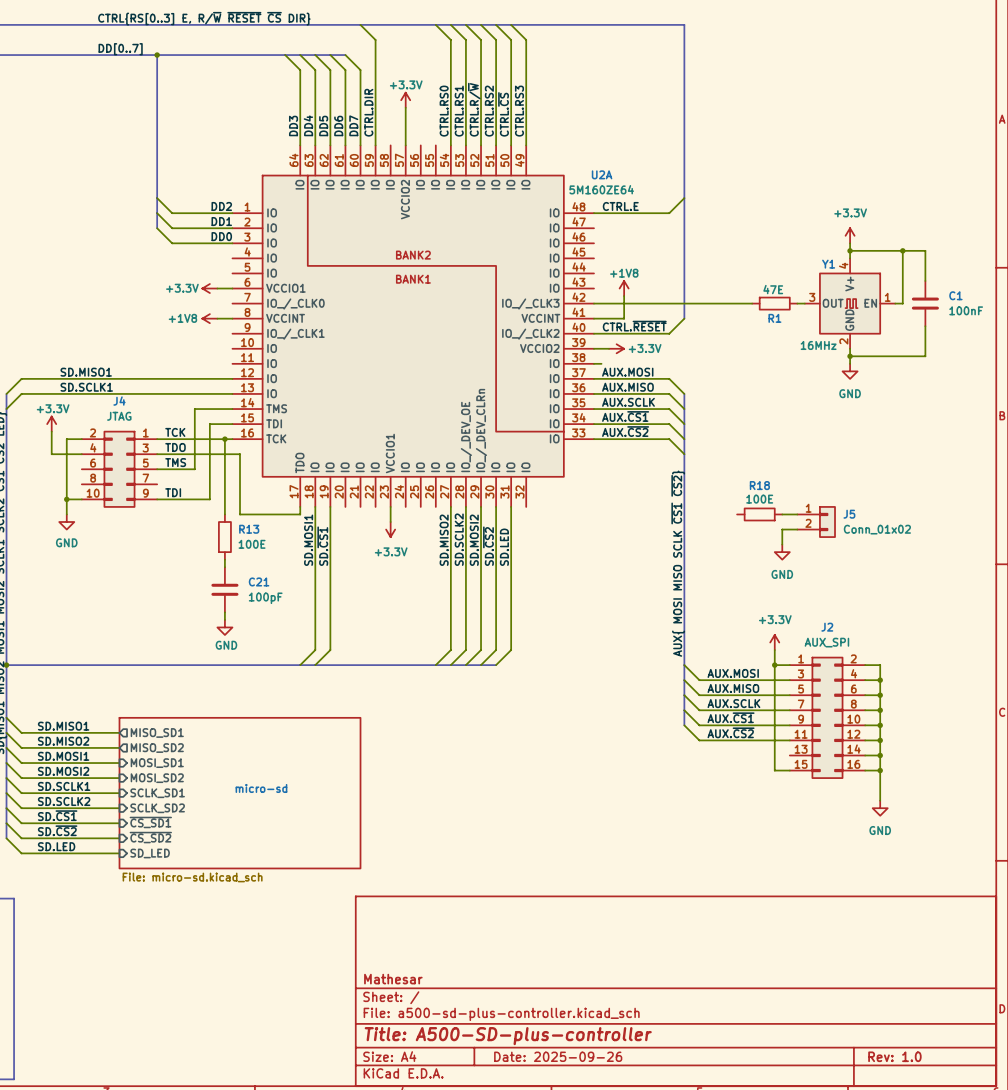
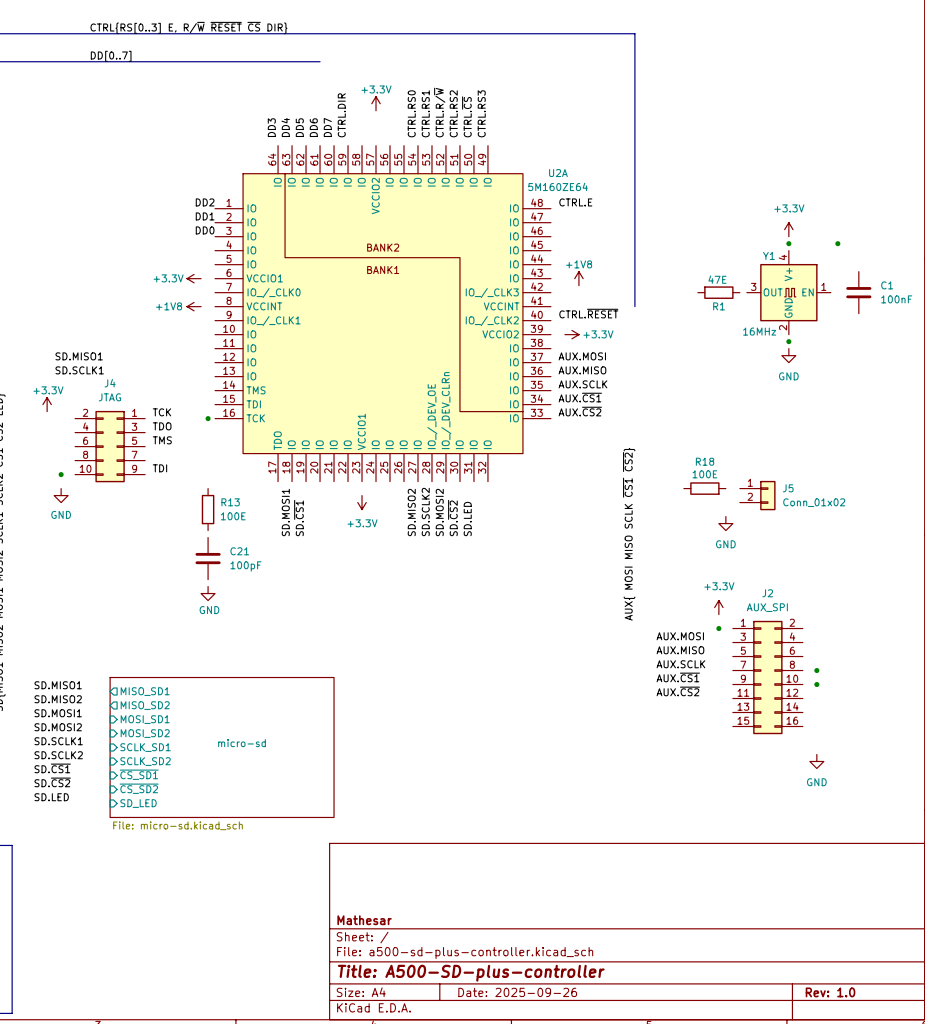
wire: (360, 24) (375, 39) (375, 145) -> none
wire: (435, 24) (450, 39) (450, 145) -> none
wire: (450, 24) (465, 39) (465, 145) -> none
wire: (465, 24) (481, 39) (481, 145) -> none
wire: (481, 24) (496, 39) (496, 145) -> none
wire: (496, 24) (511, 39) (511, 145) -> none
wire: (511, 24) (526, 39) (526, 145) -> none
bus: (157, 55) (157, 228) -> none
junction: (157, 55) -> none
wire: (285, 55) (300, 70) (300, 145) -> none
wire: (300, 55) (315, 70) (315, 145) -> none
wire: (315, 55) (330, 70) (330, 145) -> none
wire: (330, 55) (345, 70) (345, 145) -> none
wire: (345, 55) (360, 70) (360, 145) -> none
wire: (405, 107) (405, 145) -> none
wire: (157, 198) (172, 213) (232, 213) -> none
wire: (684, 198) (669, 213) (593, 213) -> none
wire: (157, 213) (172, 228) (232, 228) -> none
wire: (157, 228) (172, 243) (232, 243) -> none
wire: (850, 243) (850, 258) -> none
wire: (850, 250) (925, 250) (925, 280) -> none
wire: (902, 250) (902, 303) (895, 303) -> none
wire: (217, 288) (232, 288) -> none
wire: (624, 296) (624, 318) (593, 318) -> none
wire: (593, 303) (752, 303) -> none
wire: (797, 303) (804, 303) -> none
wire: (217, 318) (232, 318) -> none
wire: (684, 318) (669, 333) (593, 333) -> none
wire: (925, 326) (925, 356) (850, 356) -> none
wire: (593, 348) (609, 348) -> none
wire: (850, 348) (850, 363) -> none
wire: (593, 363) (601, 363) -> none
wire: (232, 378) (21, 378) (6, 393) -> none
wire: (593, 378) (669, 378) (684, 393) -> none
bus: (6, 393) (6, 838) -> none
wire: (232, 393) (21, 393) (6, 409) -> none
wire: (593, 393) (669, 393) (684, 409) -> none
bus: (684, 393) (684, 725) -> none
wire: (232, 409) (194, 409) (194, 469) (157, 469) -> none
wire: (593, 409) (669, 409) (684, 424) -> none
wire: (232, 424) (209, 424) (209, 499) (157, 499) -> none
wire: (593, 424) (669, 424) (684, 439) -> none
wire: (51, 431) (51, 454) (81, 454) -> none
wire: (81, 439) (66, 439) (66, 514) -> none
wire: (157, 439) (232, 439) -> none
wire: (224, 439) (224, 514) -> none
wire: (593, 439) (669, 439) (684, 454) -> none
wire: (157, 454) (240, 454) (240, 514) (300, 514) (300, 506) -> none
wire: (66, 499) (81, 499) -> none
wire: (315, 506) (315, 650) (300, 665) -> none
wire: (330, 506) (330, 650) (315, 665) -> none
wire: (390, 506) (390, 522) -> none
wire: (450, 506) (450, 650) (435, 665) -> none
wire: (465, 506) (465, 650) (450, 665) -> none
wire: (481, 506) (481, 650) (465, 665) -> none
wire: (496, 506) (496, 650) (481, 665) -> none
wire: (511, 506) (511, 650) (496, 665) -> none
wire: (782, 514) (797, 514) -> none
wire: (797, 529) (782, 529) (782, 544) -> none
wire: (224, 559) (224, 567) -> none
wire: (224, 612) (224, 619) -> none
wire: (774, 650) (774, 770) (789, 770) -> none
bus: (6, 665) (496, 665) -> none
junction: (6, 665) -> none
wire: (684, 665) (699, 680) (789, 680) -> none
wire: (774, 665) (789, 665) -> none
wire: (865, 665) (880, 665) (880, 800) -> none
wire: (684, 680) (699, 695) (789, 695) -> none
wire: (865, 680) (880, 680) -> none
junction: (880, 680) -> none
wire: (684, 695) (699, 710) (789, 710) -> none
wire: (865, 695) (880, 695) -> none
junction: (880, 695) -> none
wire: (684, 710) (699, 725) (789, 725) -> none
wire: (865, 710) (880, 710) -> none
wire: (6, 717) (21, 732) (119, 732) -> none
wire: (684, 725) (699, 740) (789, 740) -> none
wire: (865, 725) (880, 725) -> none
wire: (6, 732) (21, 747) (119, 747) -> none
wire: (865, 740) (880, 740) -> none
junction: (880, 740) -> none
wire: (6, 747) (21, 763) (119, 763) -> none
wire: (865, 755) (880, 755) -> none
junction: (880, 755) -> none
wire: (6, 763) (21, 778) (119, 778) -> none
wire: (865, 770) (880, 770) -> none
junction: (880, 770) -> none
wire: (6, 778) (21, 793) (119, 793) -> none
wire: (6, 793) (21, 808) (119, 808) -> none
wire: (6, 808) (21, 823) (119, 823) -> none
wire: (6, 823) (21, 838) (119, 838) -> none
wire: (6, 838) (21, 853) (119, 853) -> none

